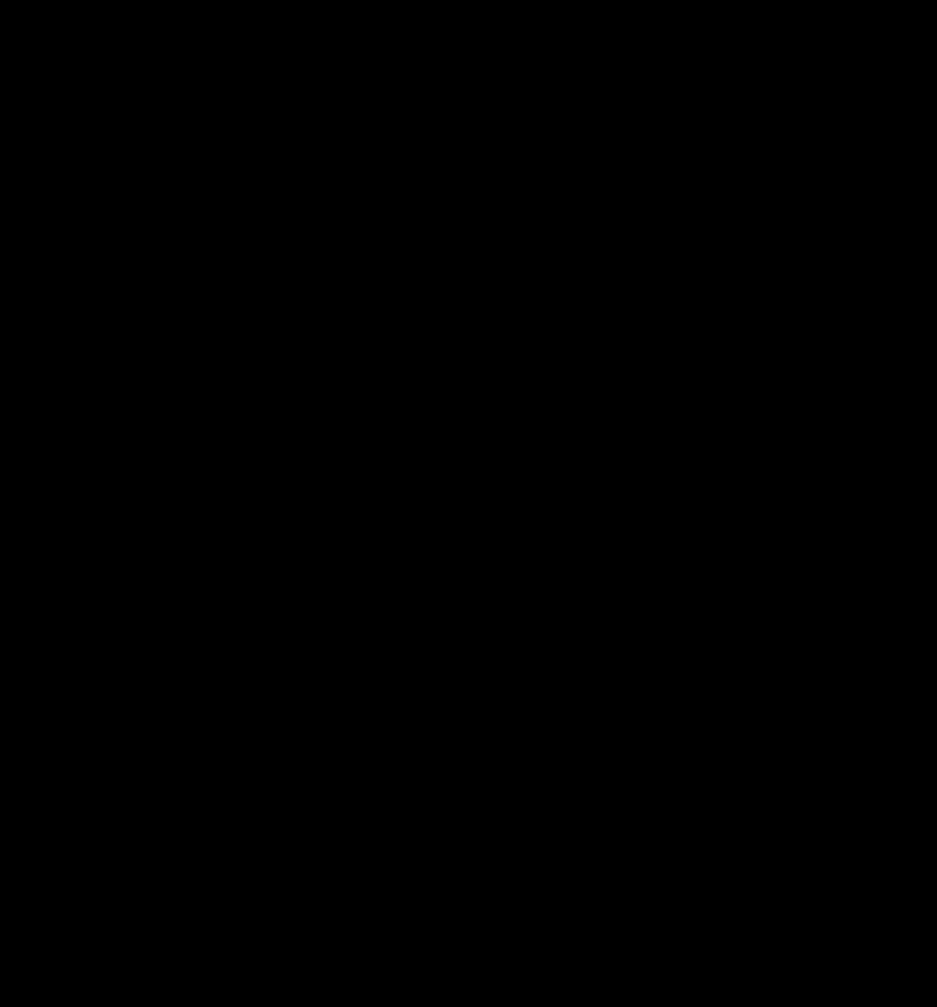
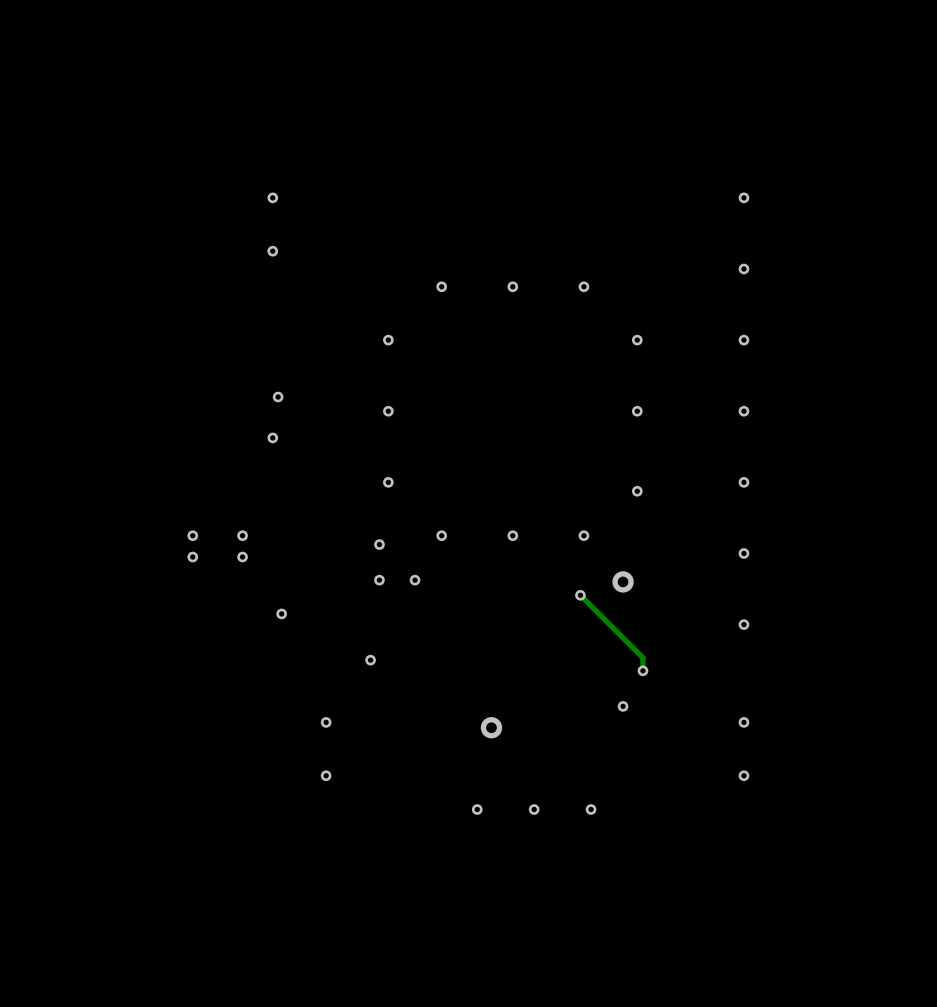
via: none -> (272, 197)
via: none -> (743, 197)
via: none -> (272, 251)
via: none -> (743, 268)
via: none -> (441, 286)
via: none -> (512, 286)
via: none -> (583, 286)
via: none -> (388, 340)
via: none -> (637, 340)
via: none -> (743, 340)
via: none -> (278, 397)
via: none -> (388, 411)
via: none -> (637, 411)
via: none -> (743, 411)
via: none -> (272, 437)
via: none -> (388, 482)
via: none -> (743, 482)
via: none -> (637, 491)
via: none -> (192, 535)
via: none -> (242, 535)
via: none -> (441, 535)
via: none -> (512, 535)
via: none -> (583, 535)
via: none -> (379, 544)
via: none -> (743, 553)
via: none -> (192, 557)
via: none -> (242, 557)
via: none -> (379, 580)
via: none -> (415, 580)
via: none -> (623, 581)
track: none -> (580, 595) (642, 657) (642, 670)
via: none -> (580, 595)
via: none -> (281, 613)
via: none -> (743, 624)
via: none -> (370, 660)
via: none -> (642, 670)
via: none -> (623, 706)
via: none -> (326, 722)
via: none -> (743, 722)
via: none -> (491, 727)
via: none -> (326, 775)
via: none -> (743, 775)
via: none -> (477, 809)
via: none -> (534, 809)
via: none -> (591, 809)

